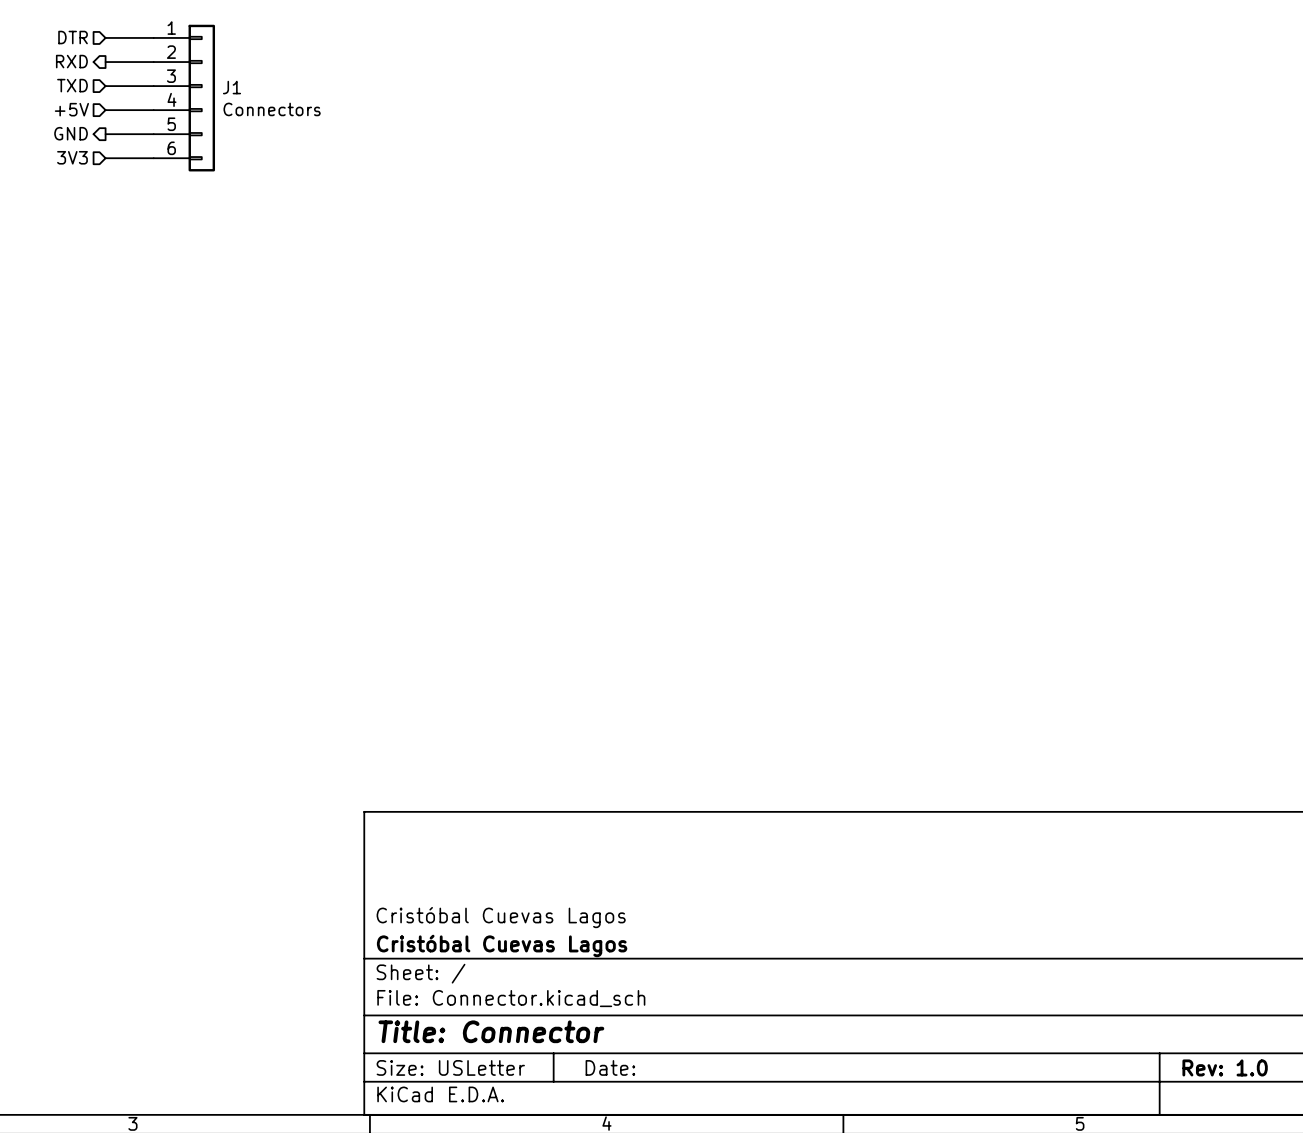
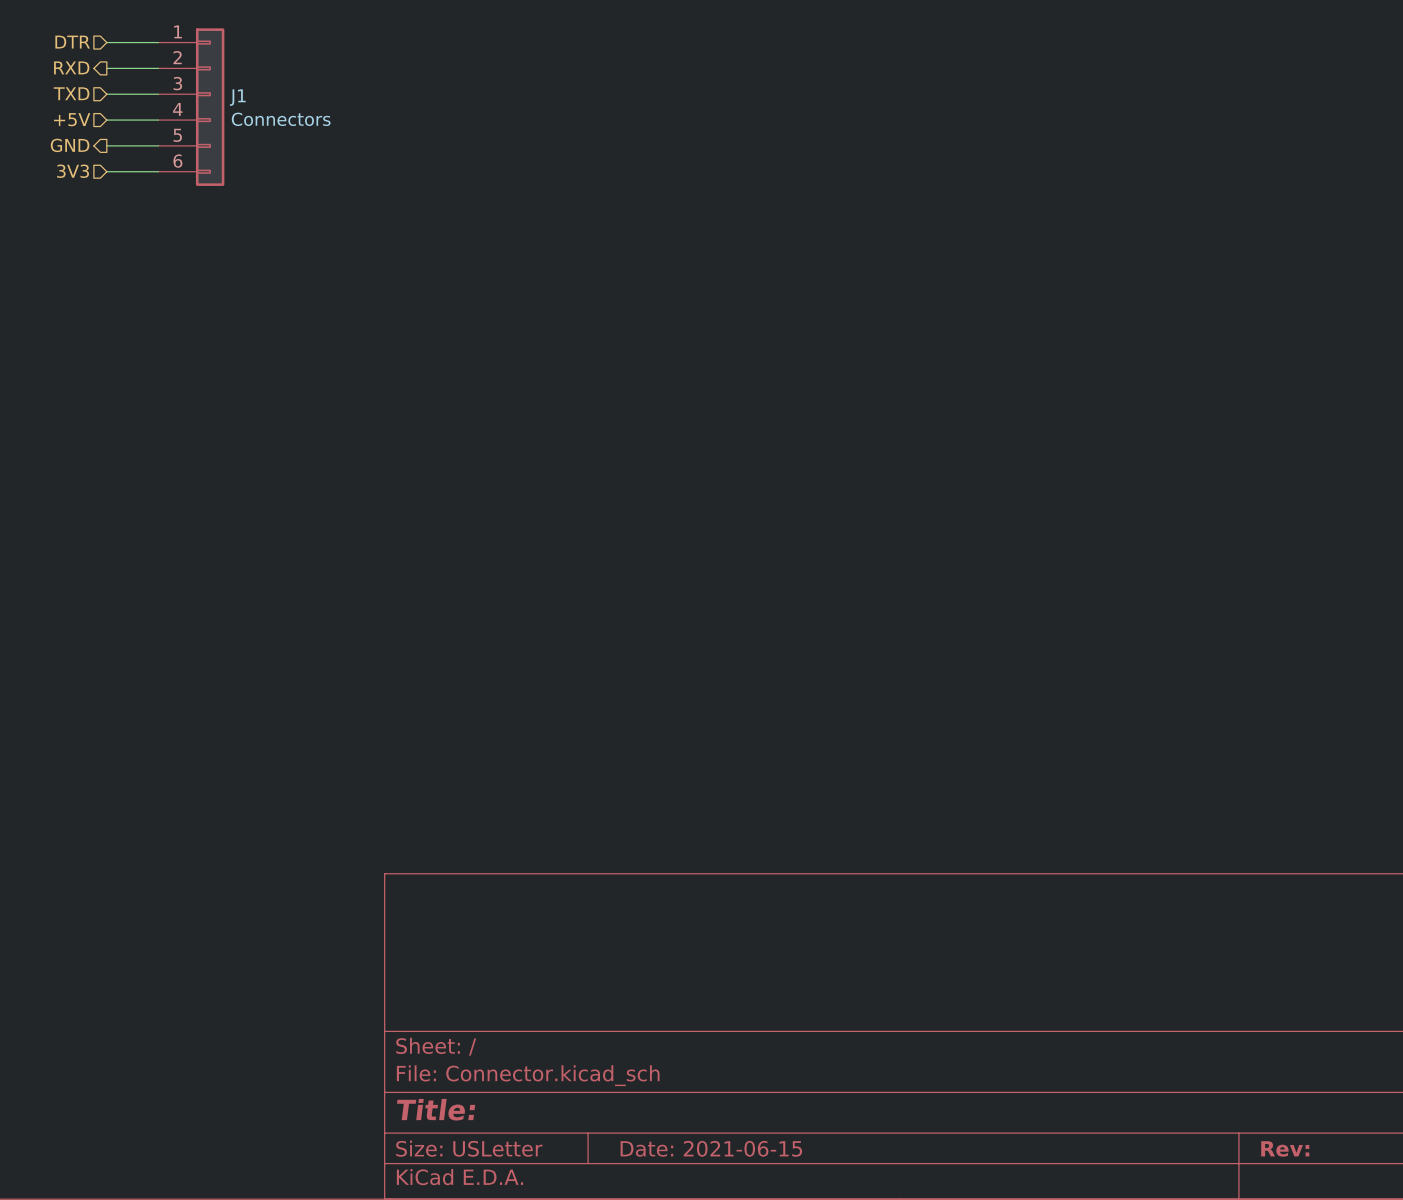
title block: Cristóbal Cuevas Lagos (501, 917) -> none
title block: Cristóbal Cuevas Lagos (502, 945) -> none
title block: Title: Connector (491, 1031) -> Title: (436, 1109)
title block: Date: (610, 1067) -> Date: 2021-06-15 (711, 1148)
title block: Rev: 1.0 (1225, 1067) -> Rev: (1285, 1148)

